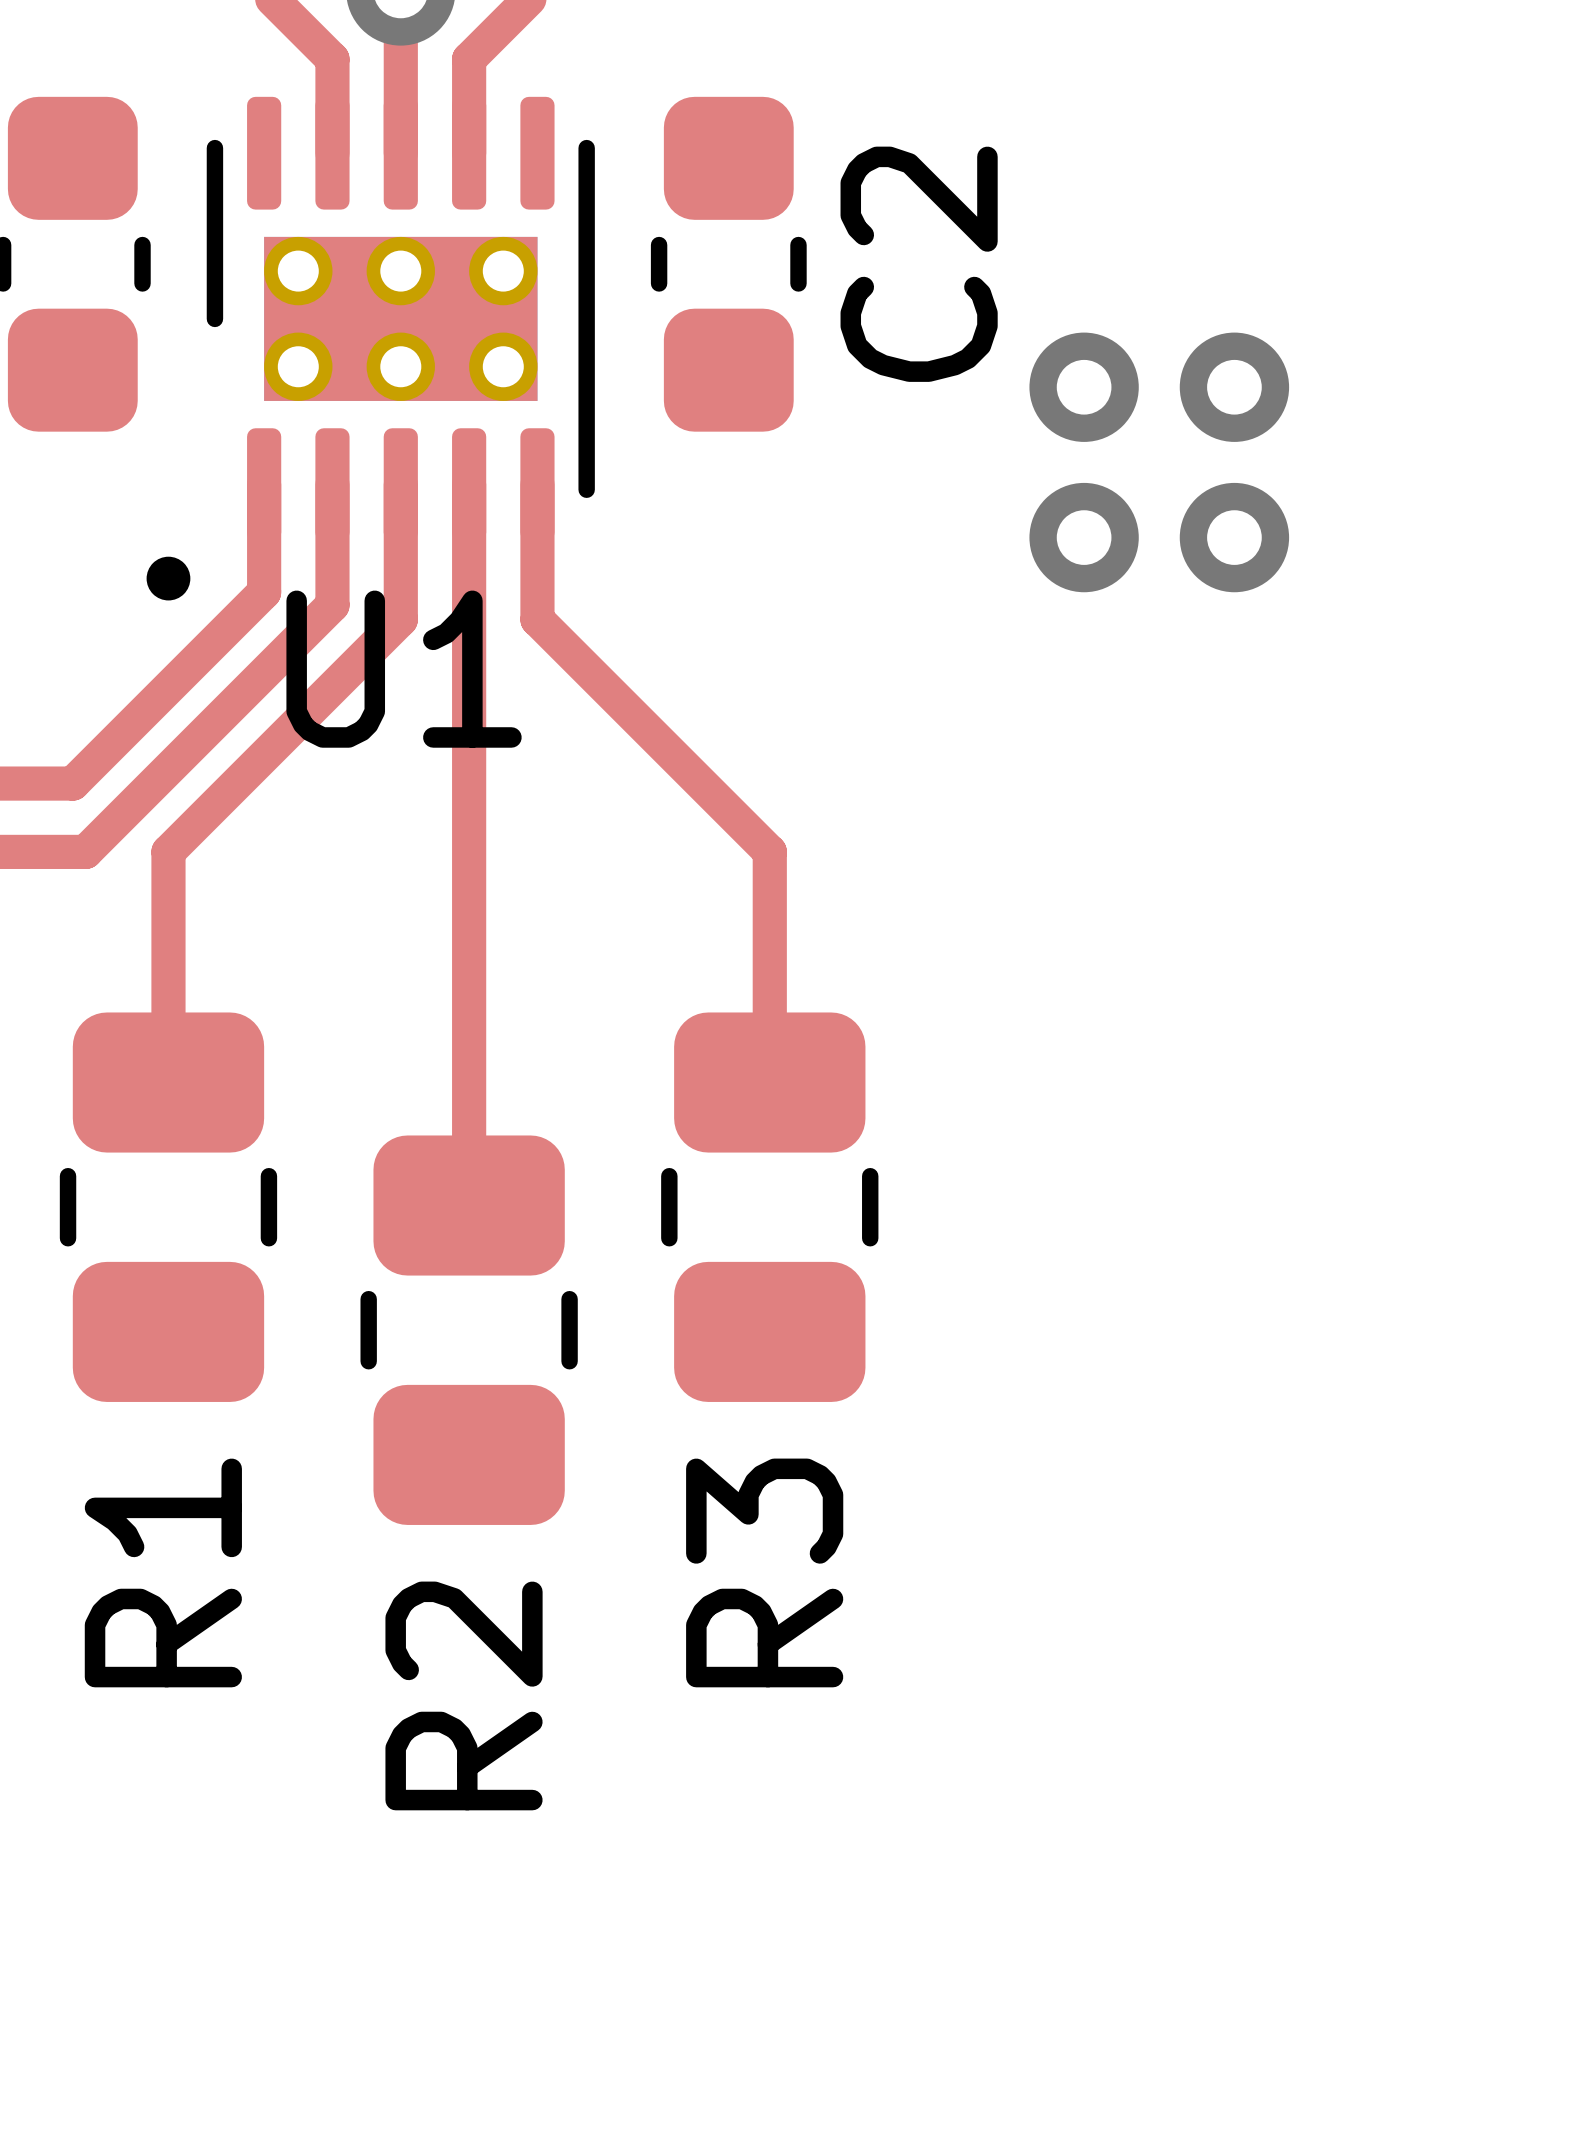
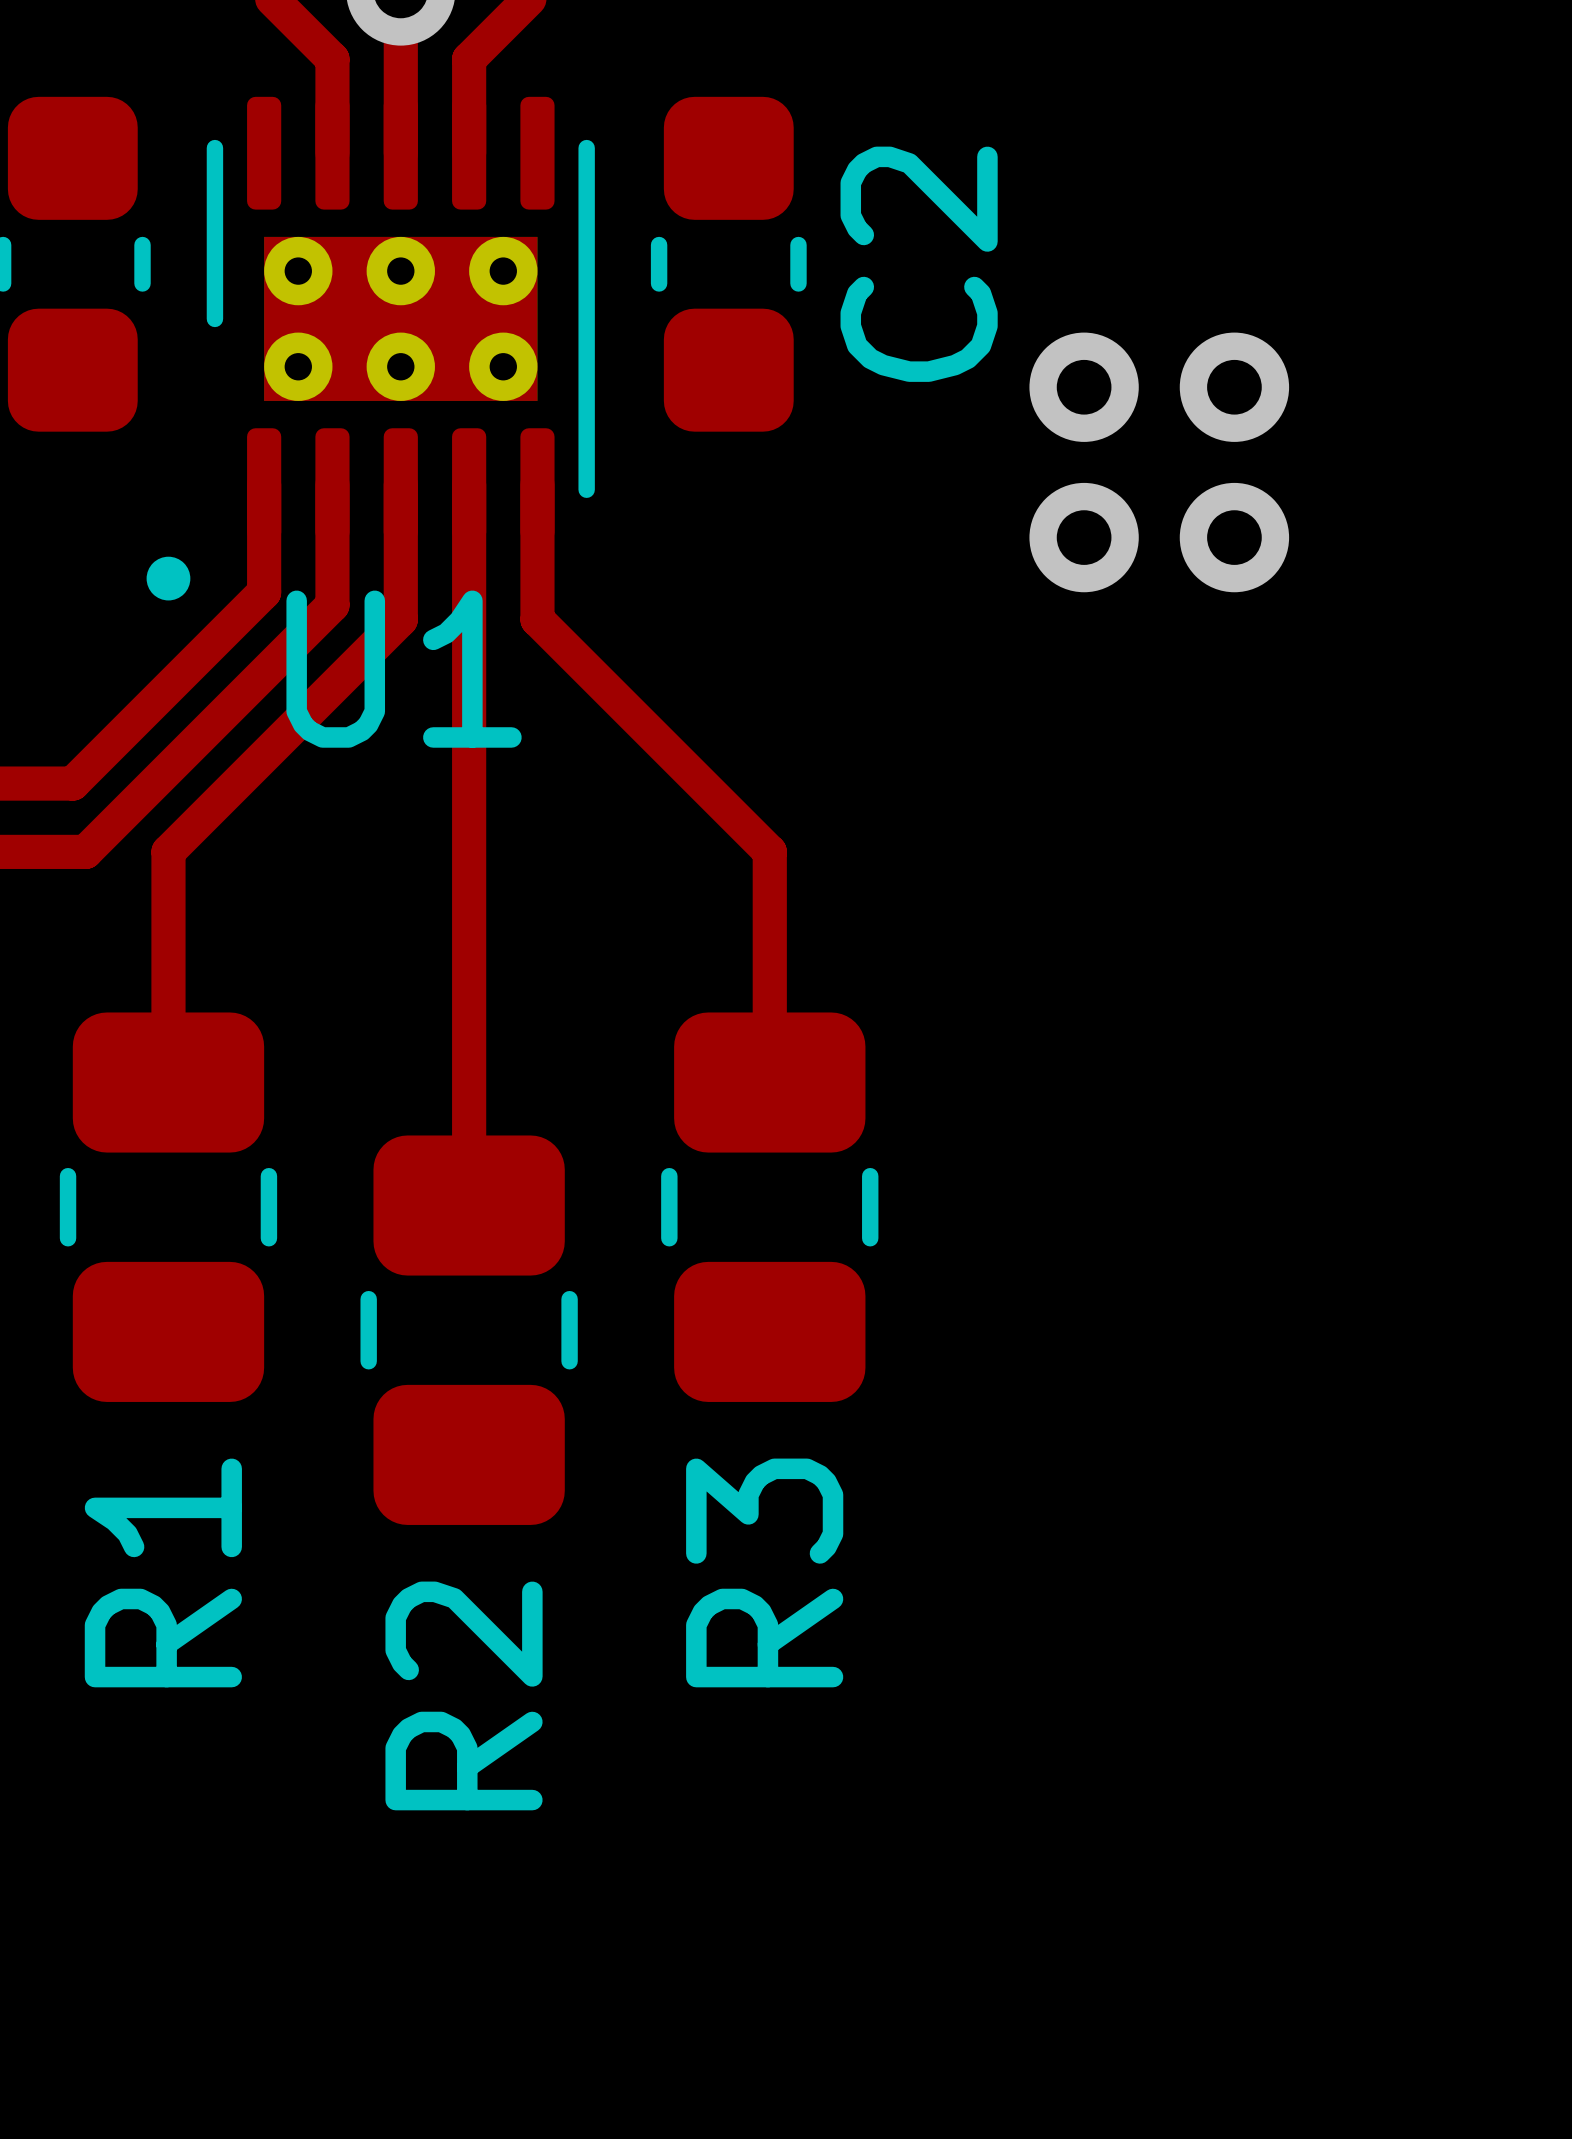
U1 footprint: [206, 96, 595, 541] -> [206, 96, 595, 541]

